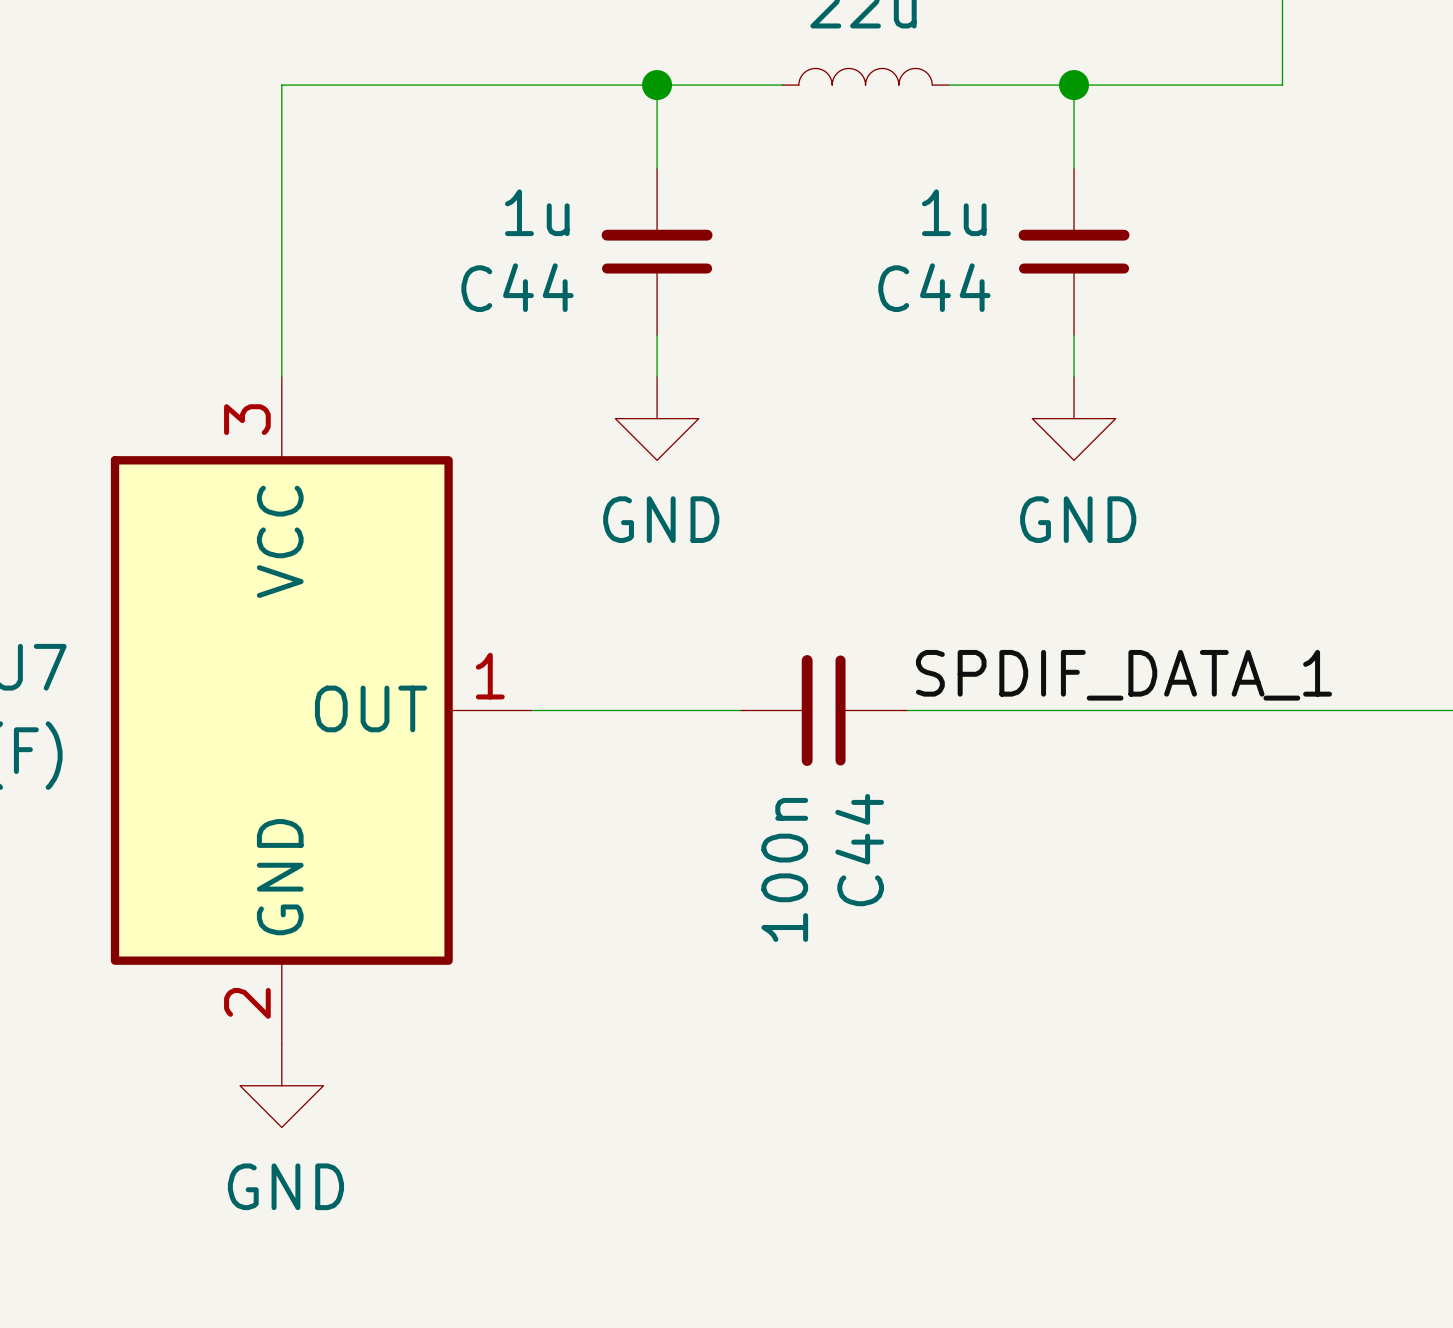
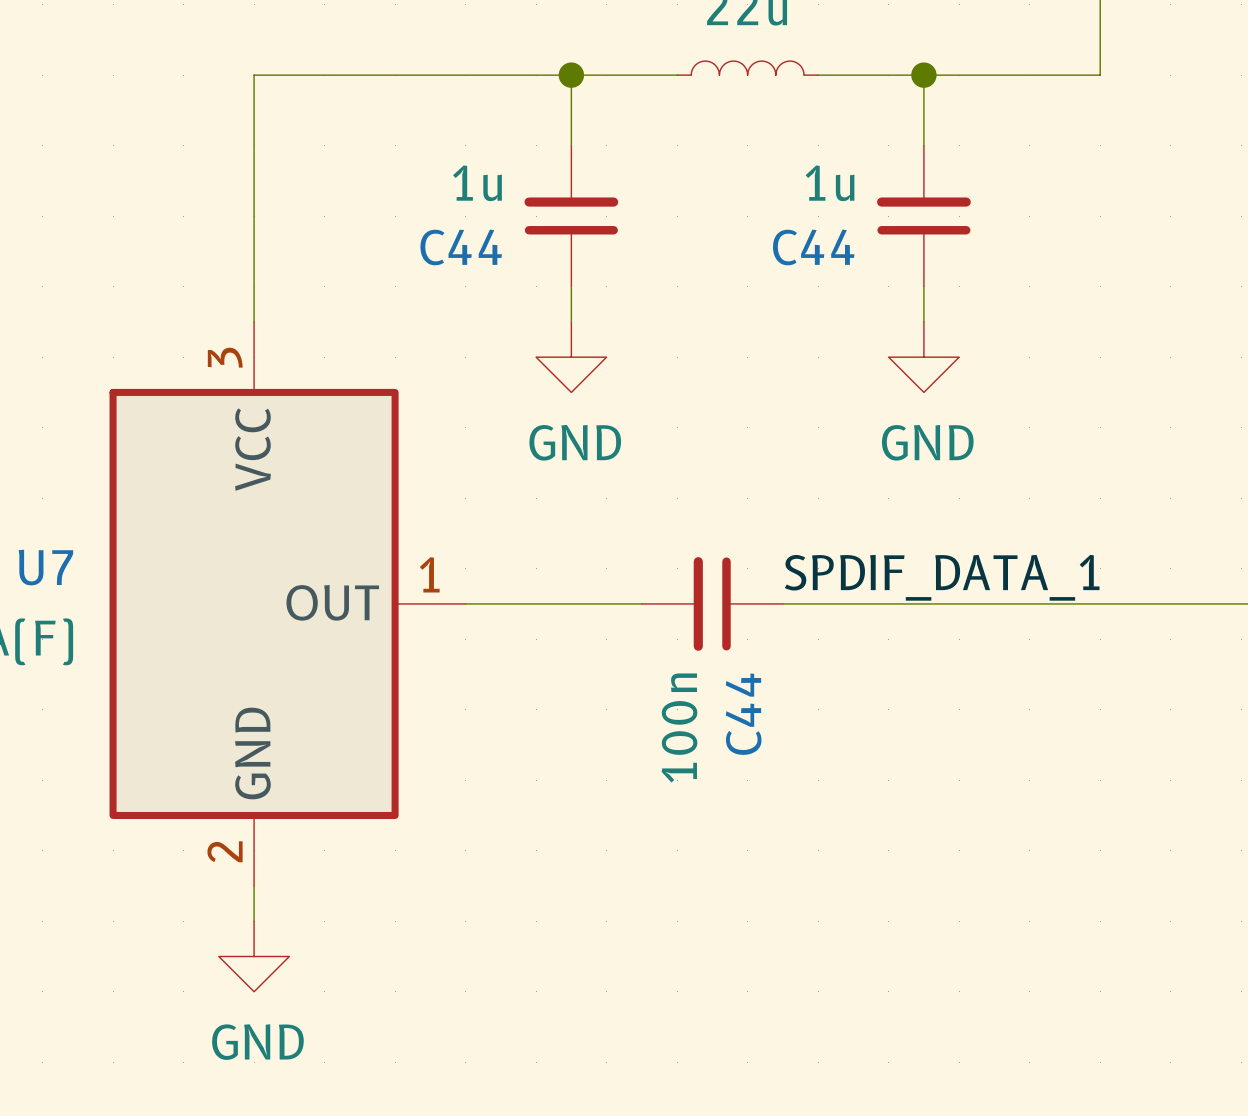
power symbol position: GND (281, 1085) -> GND (254, 956)

